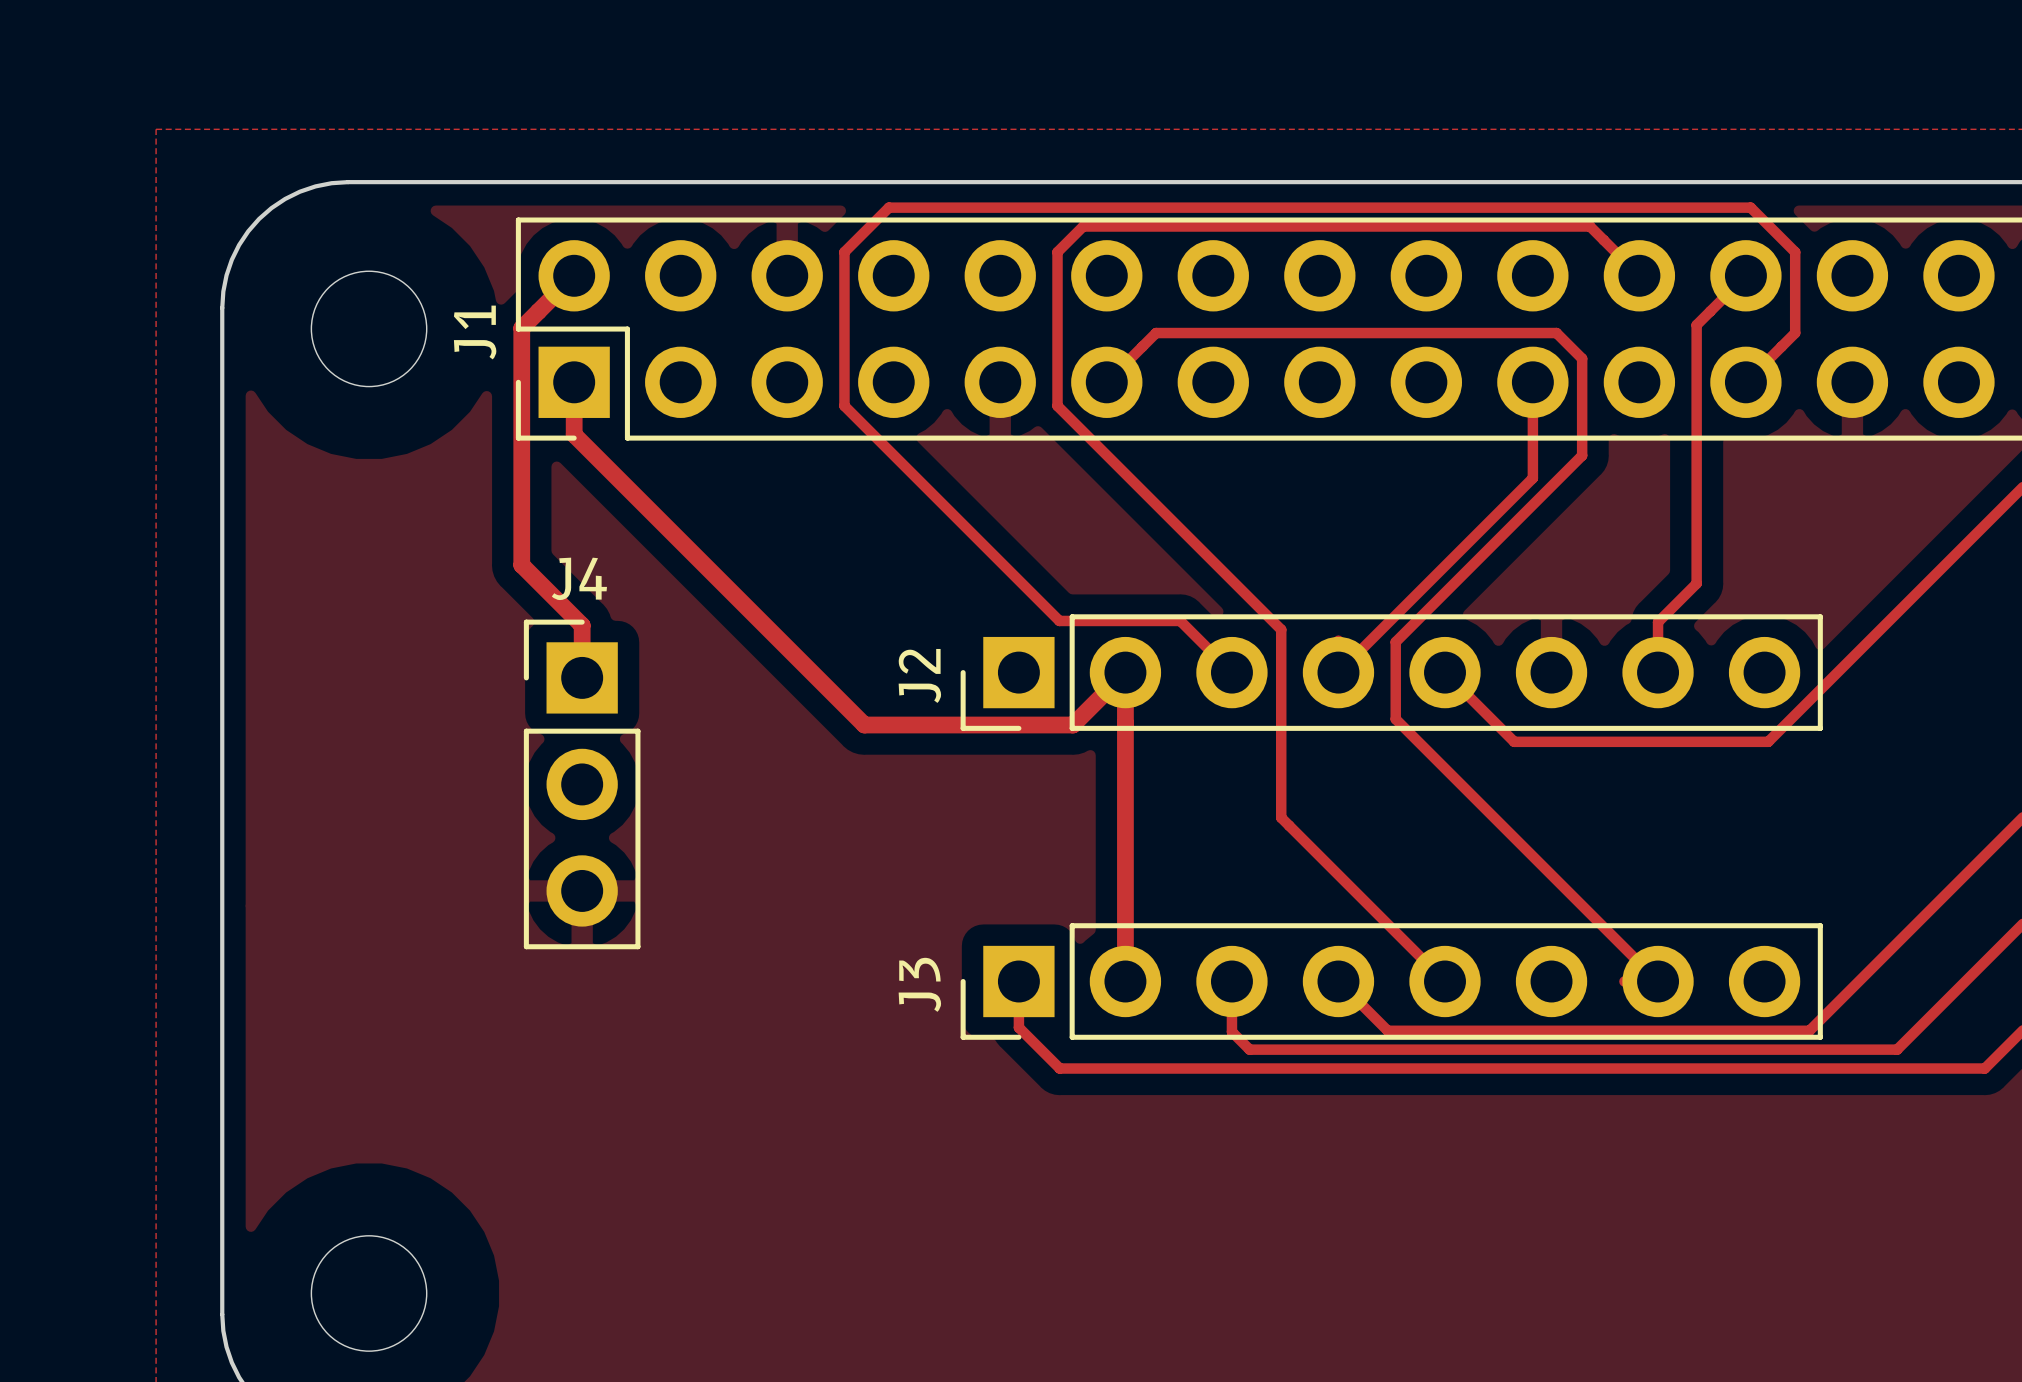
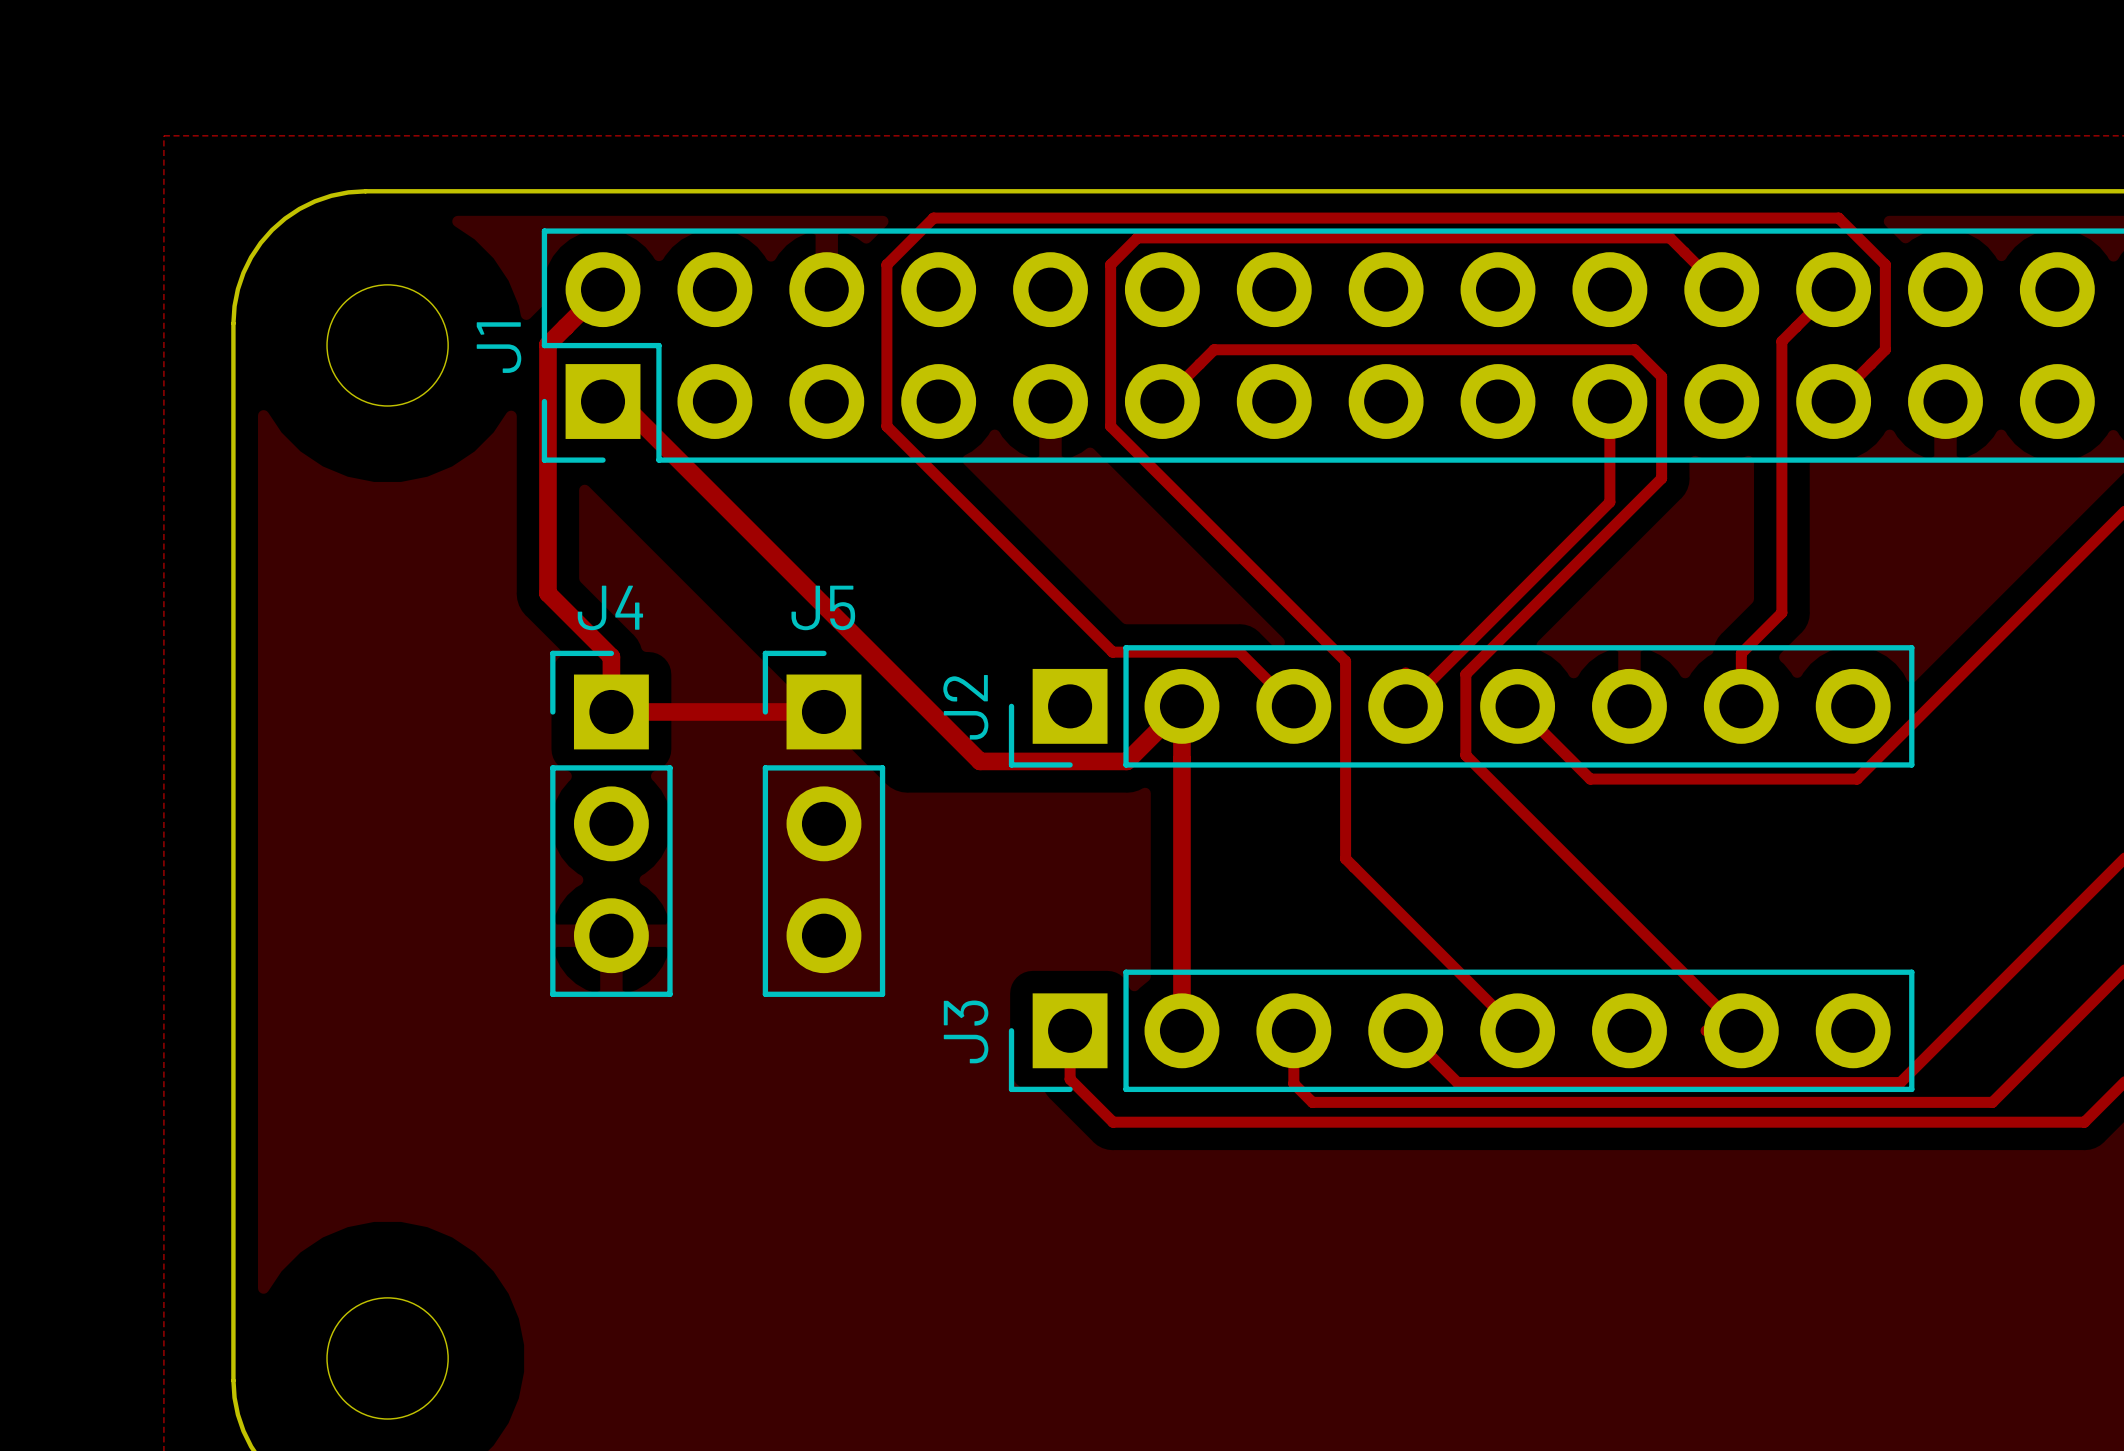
track: (574, 382) (574, 434) (864, 725) (933, 725) -> (603, 401) (620, 401) (980, 761)
track: none -> (611, 711) (823, 711)
J5: none -> (823, 823)

